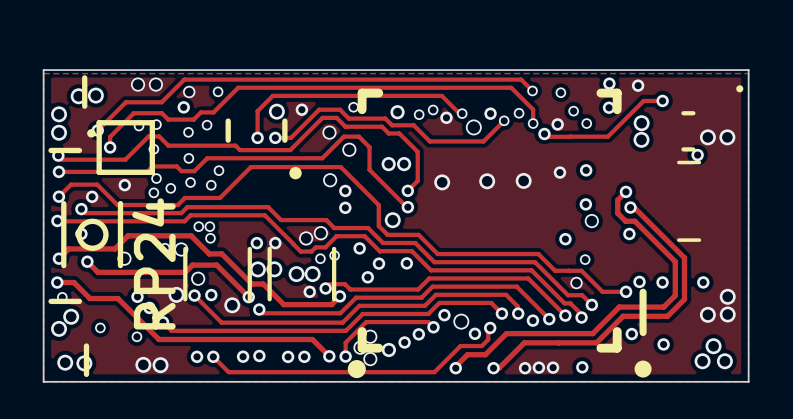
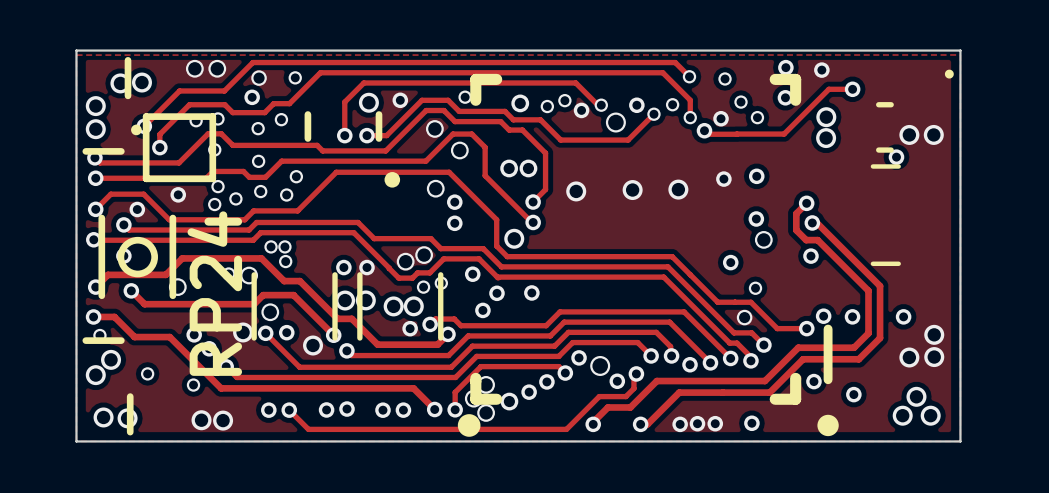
track: (387, 234) (418, 234) (437, 254) (538, 254) -> (507, 256) (672, 256) (696, 281)
track: (383, 243) (415, 243) (434, 262) (535, 262) -> (501, 266) (667, 266) (692, 291)
track: (380, 251) (411, 251) (431, 270) (531, 270) -> (497, 277) (663, 277) (688, 301)

